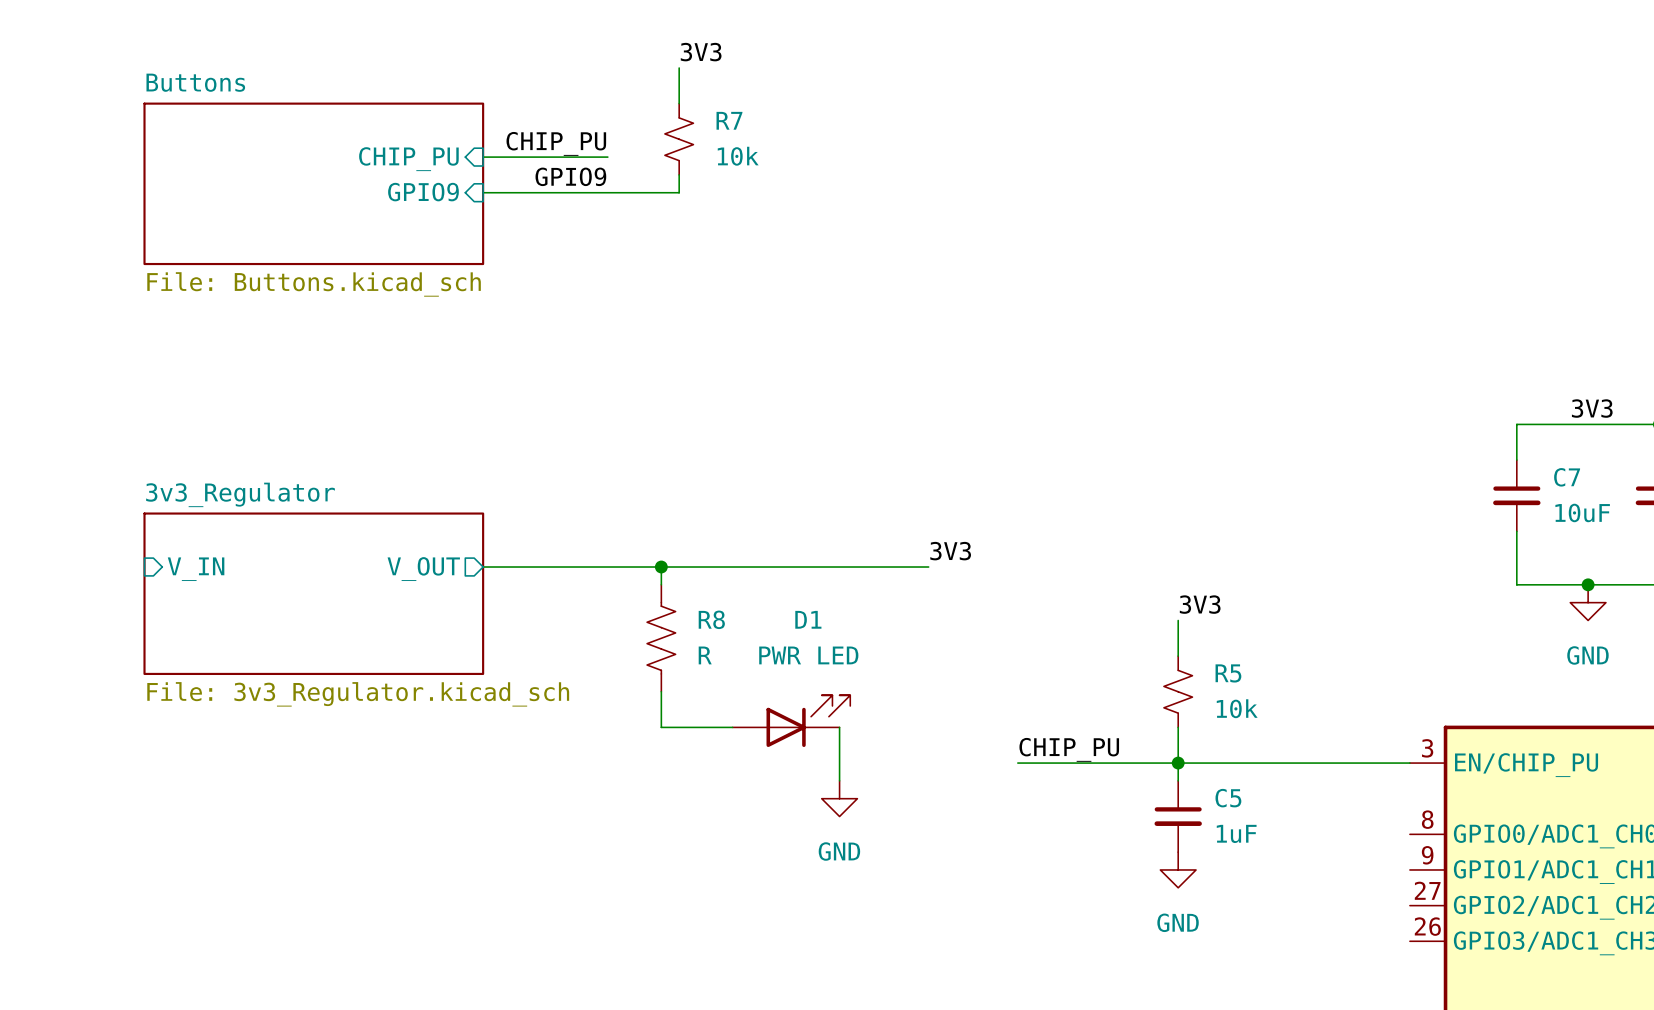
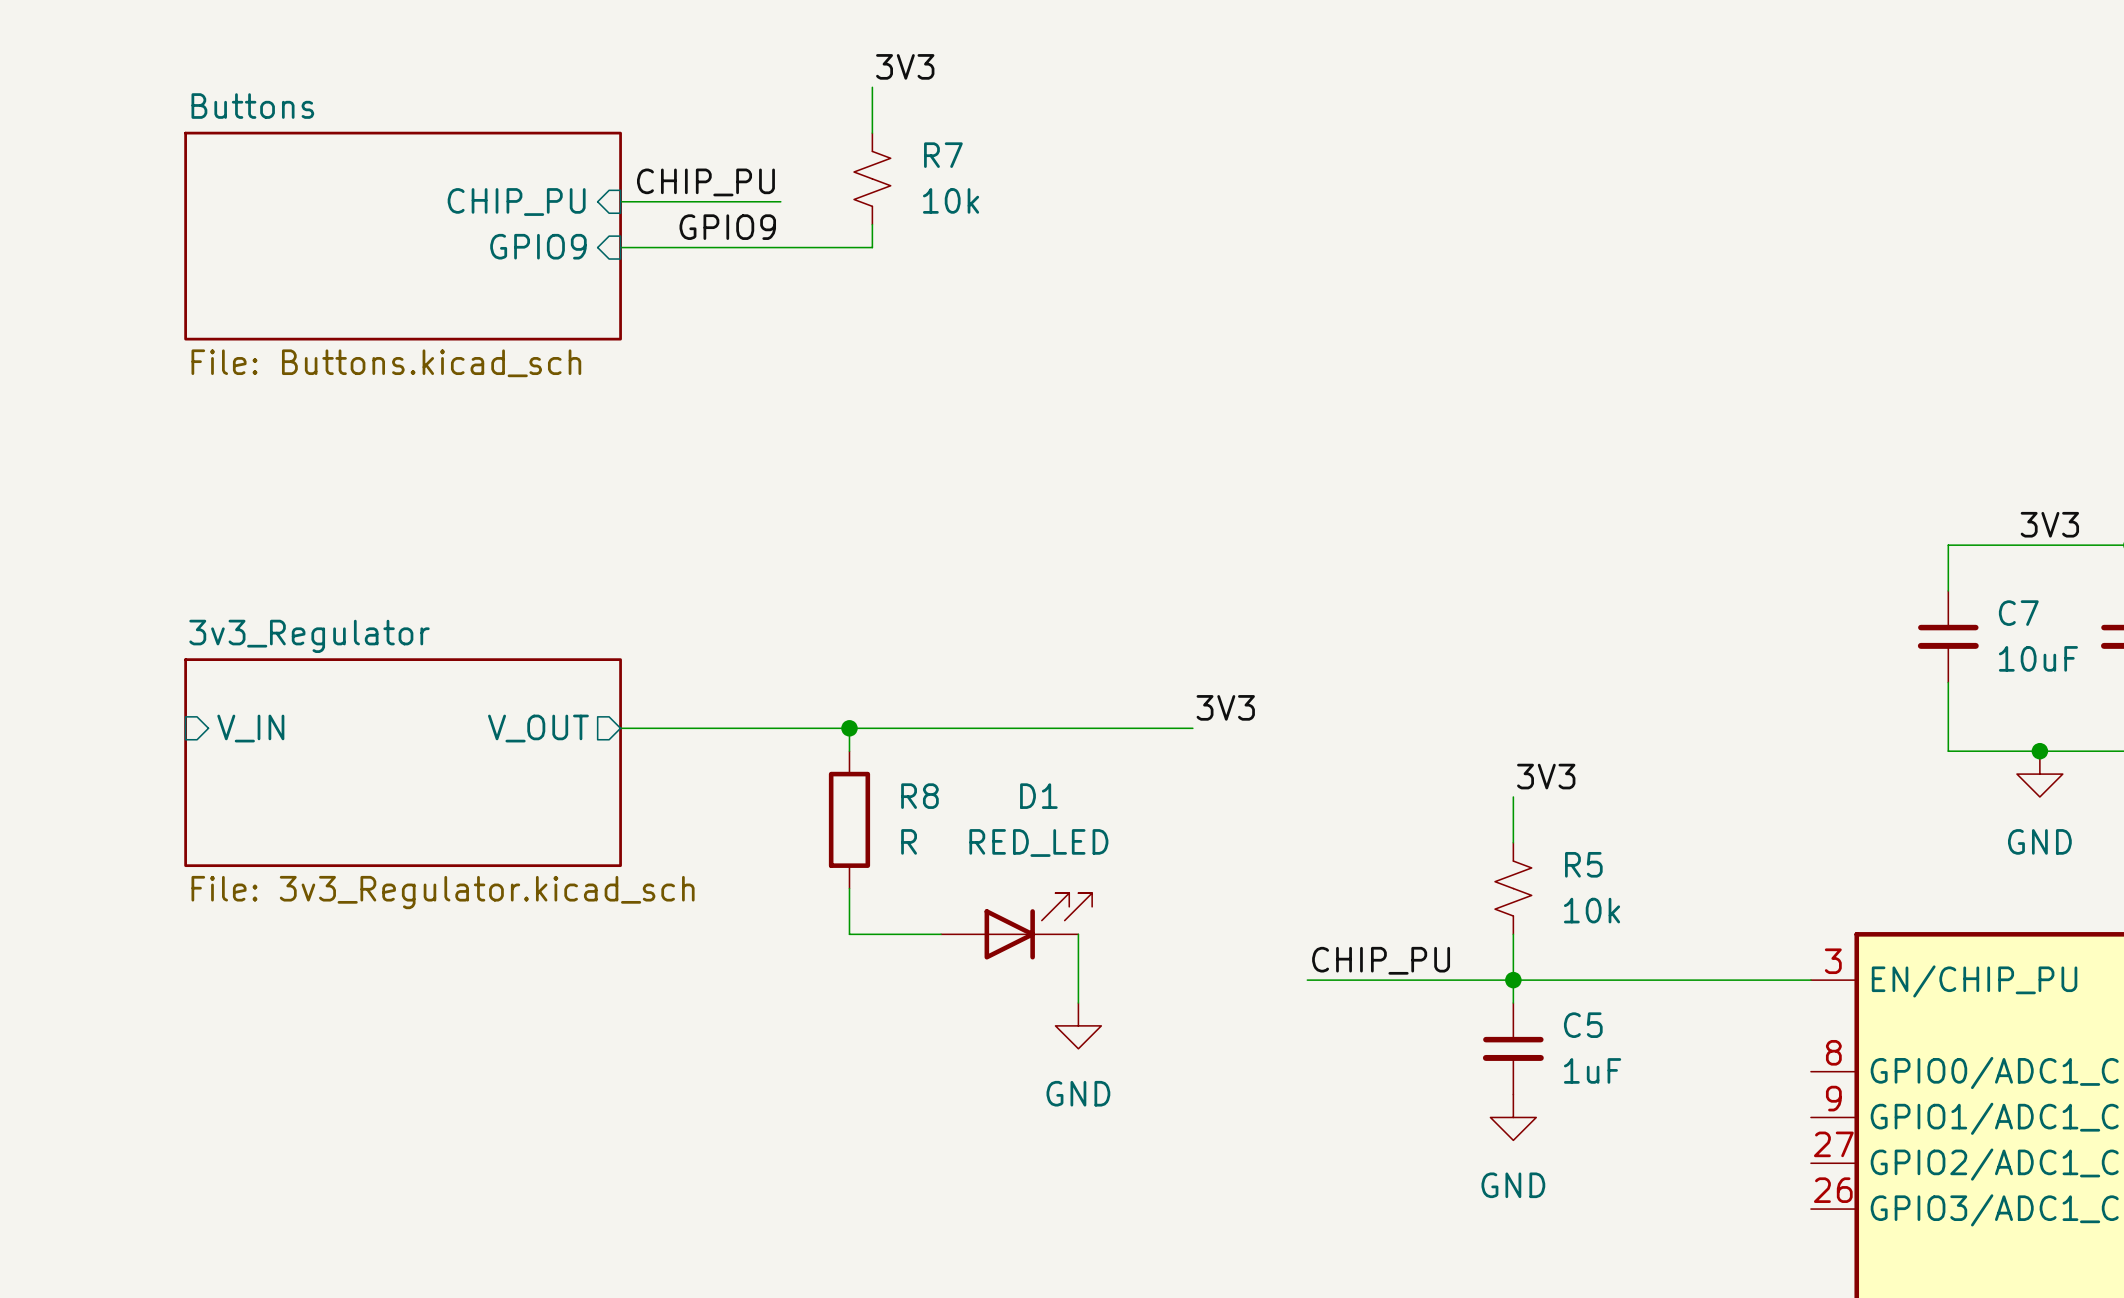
R8 symbol: [647, 584, 676, 692] -> [828, 751, 871, 889]
D1 value: PWR LED (808, 655) -> RED_LED (1038, 842)

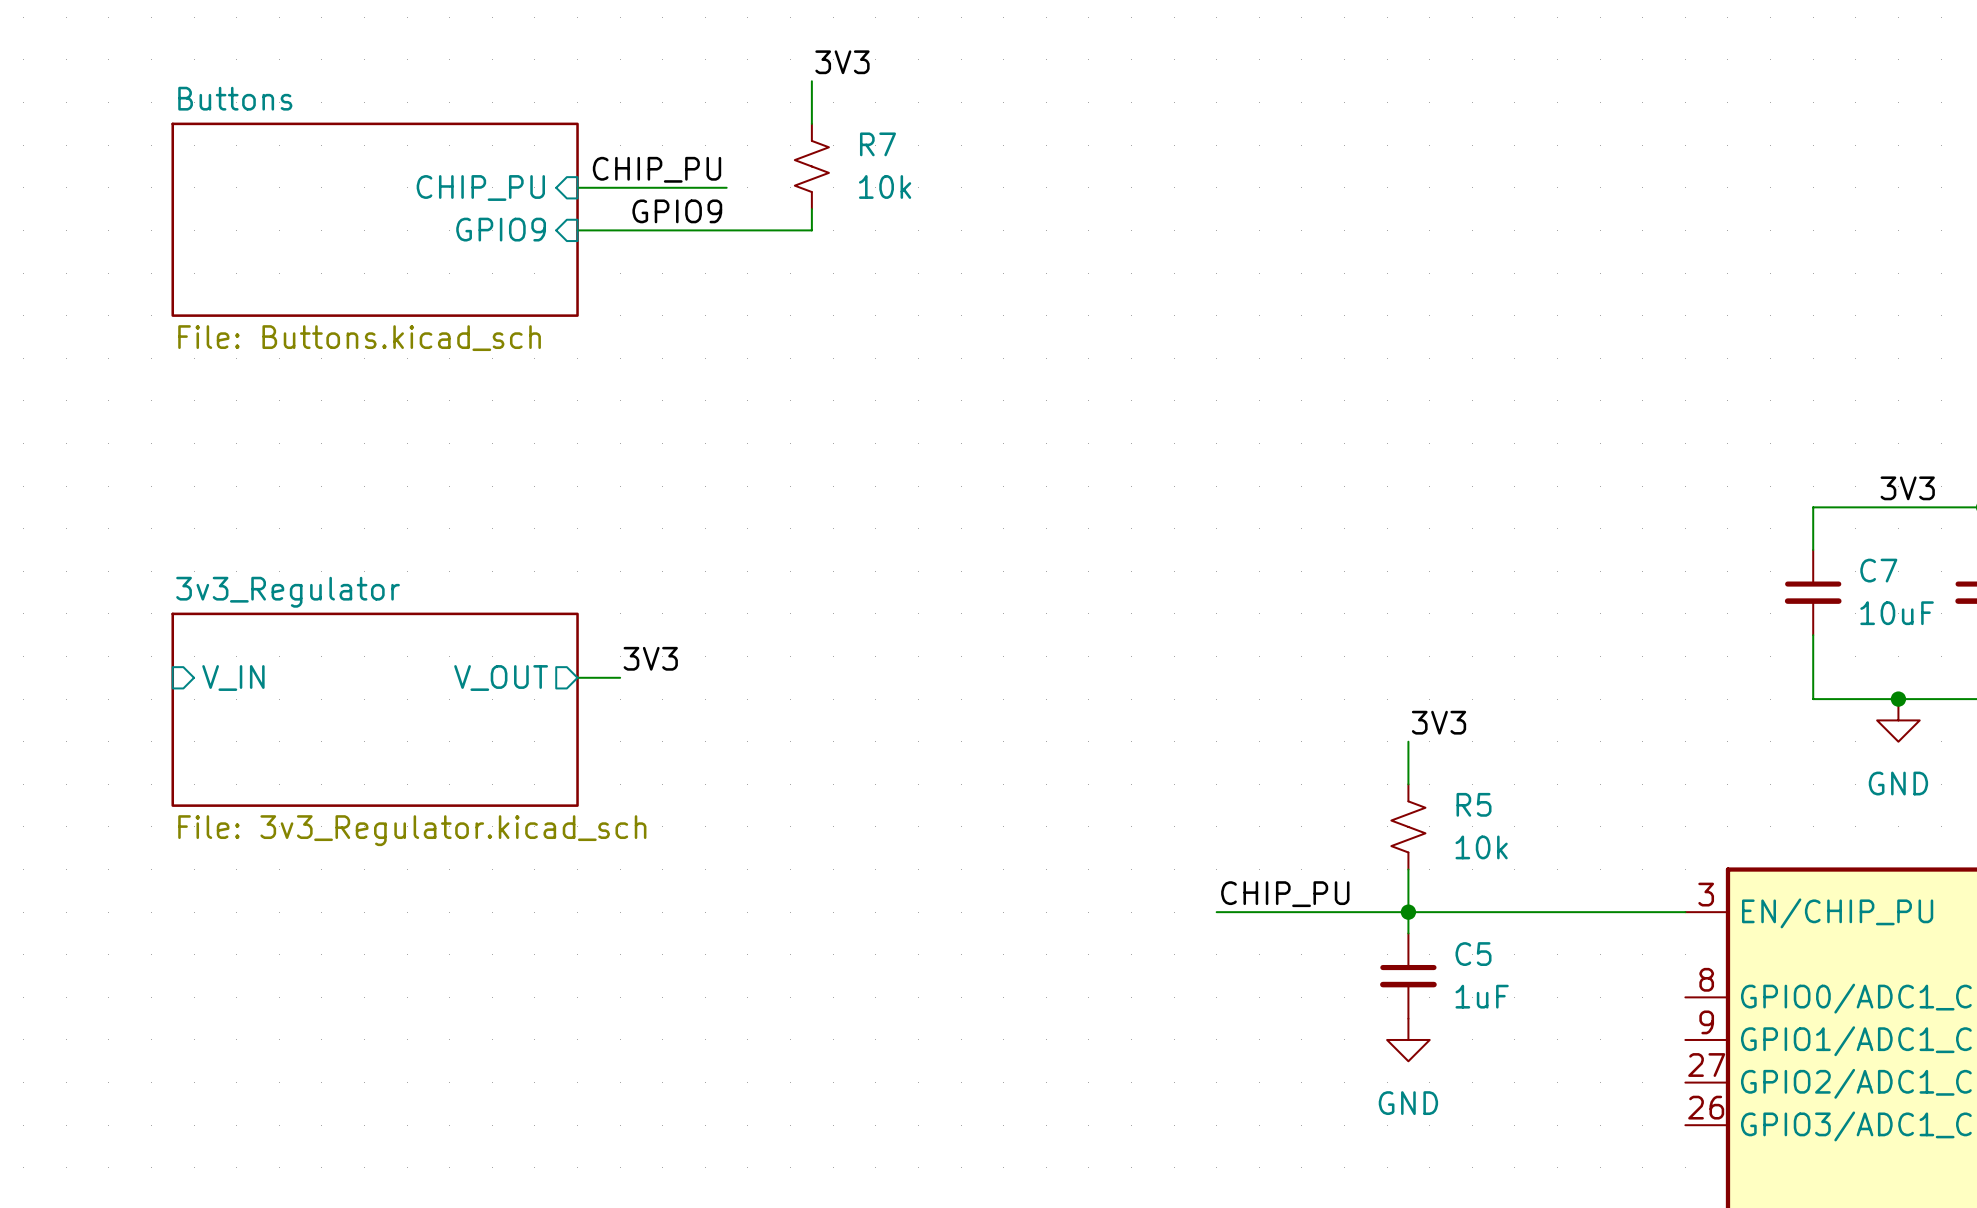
label: none -> 3V3 (650, 658)
label: 3V3 (1225, 707) -> none
wire: (666, 728) (1192, 728) -> none
wire: (849, 728) (849, 751) -> none
junction: (849, 728) -> none
R8: R (849, 819) -> none
wire: (849, 888) (849, 934) (941, 934) -> none
D1: RED_LED (1016, 926) -> none
wire: (1078, 934) (1078, 1003) -> none
power symbol: GND (1078, 1025) -> none

